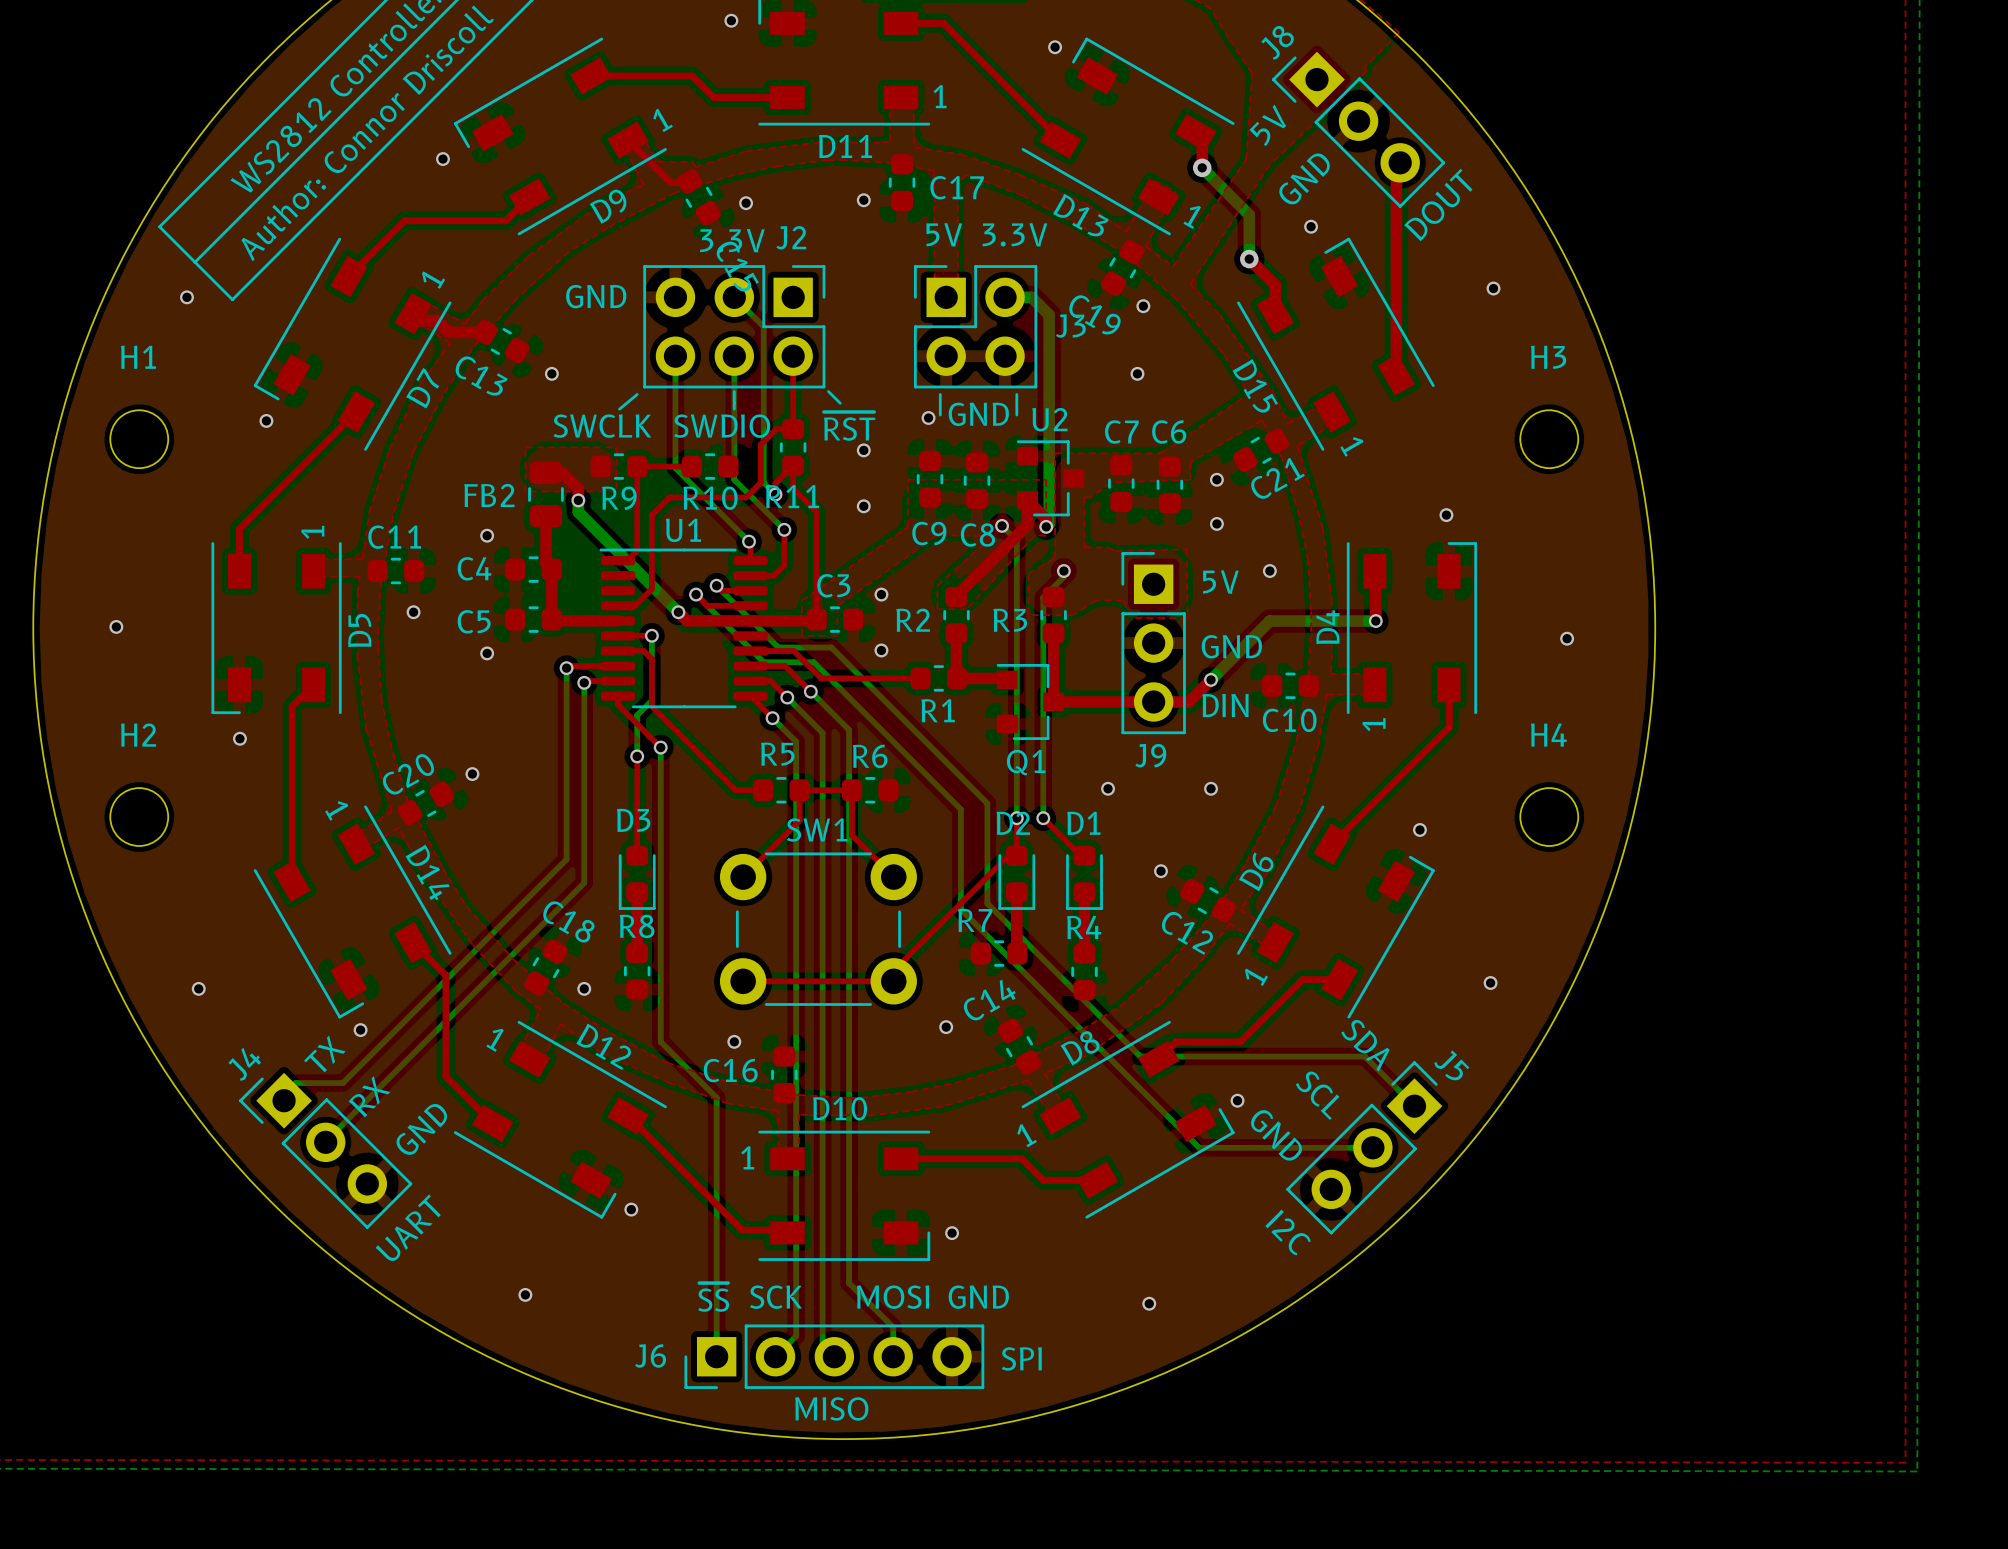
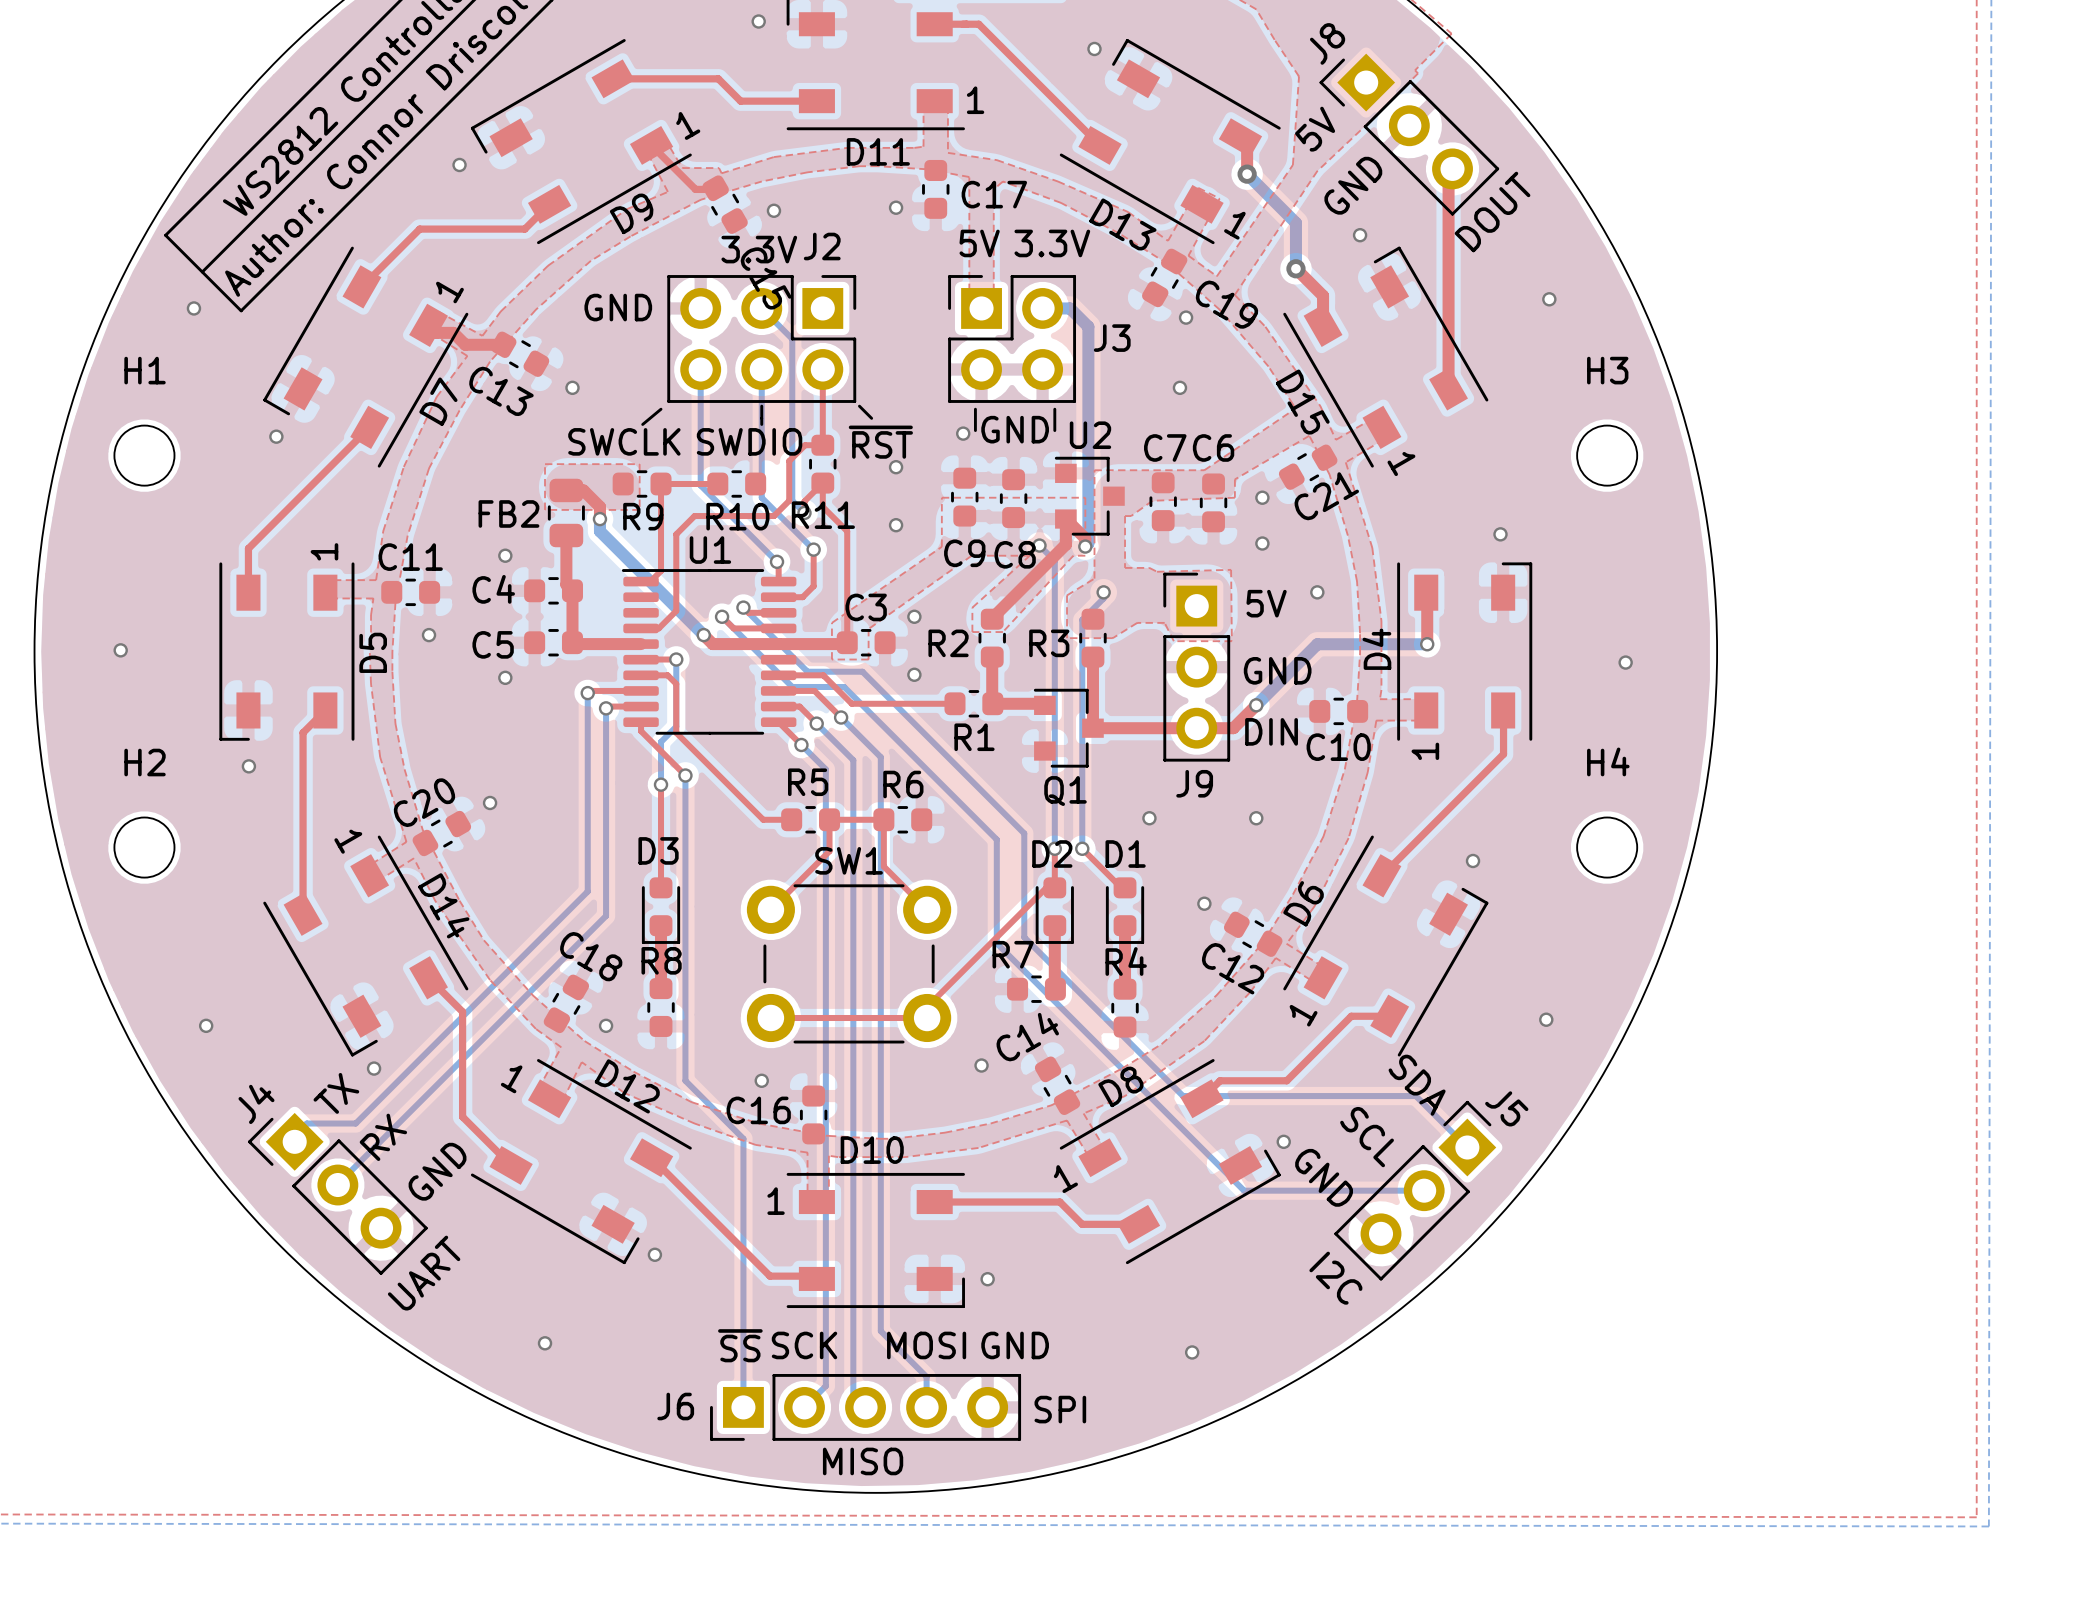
C19 name position: C19 (1094, 314) -> C19 (1226, 304)

